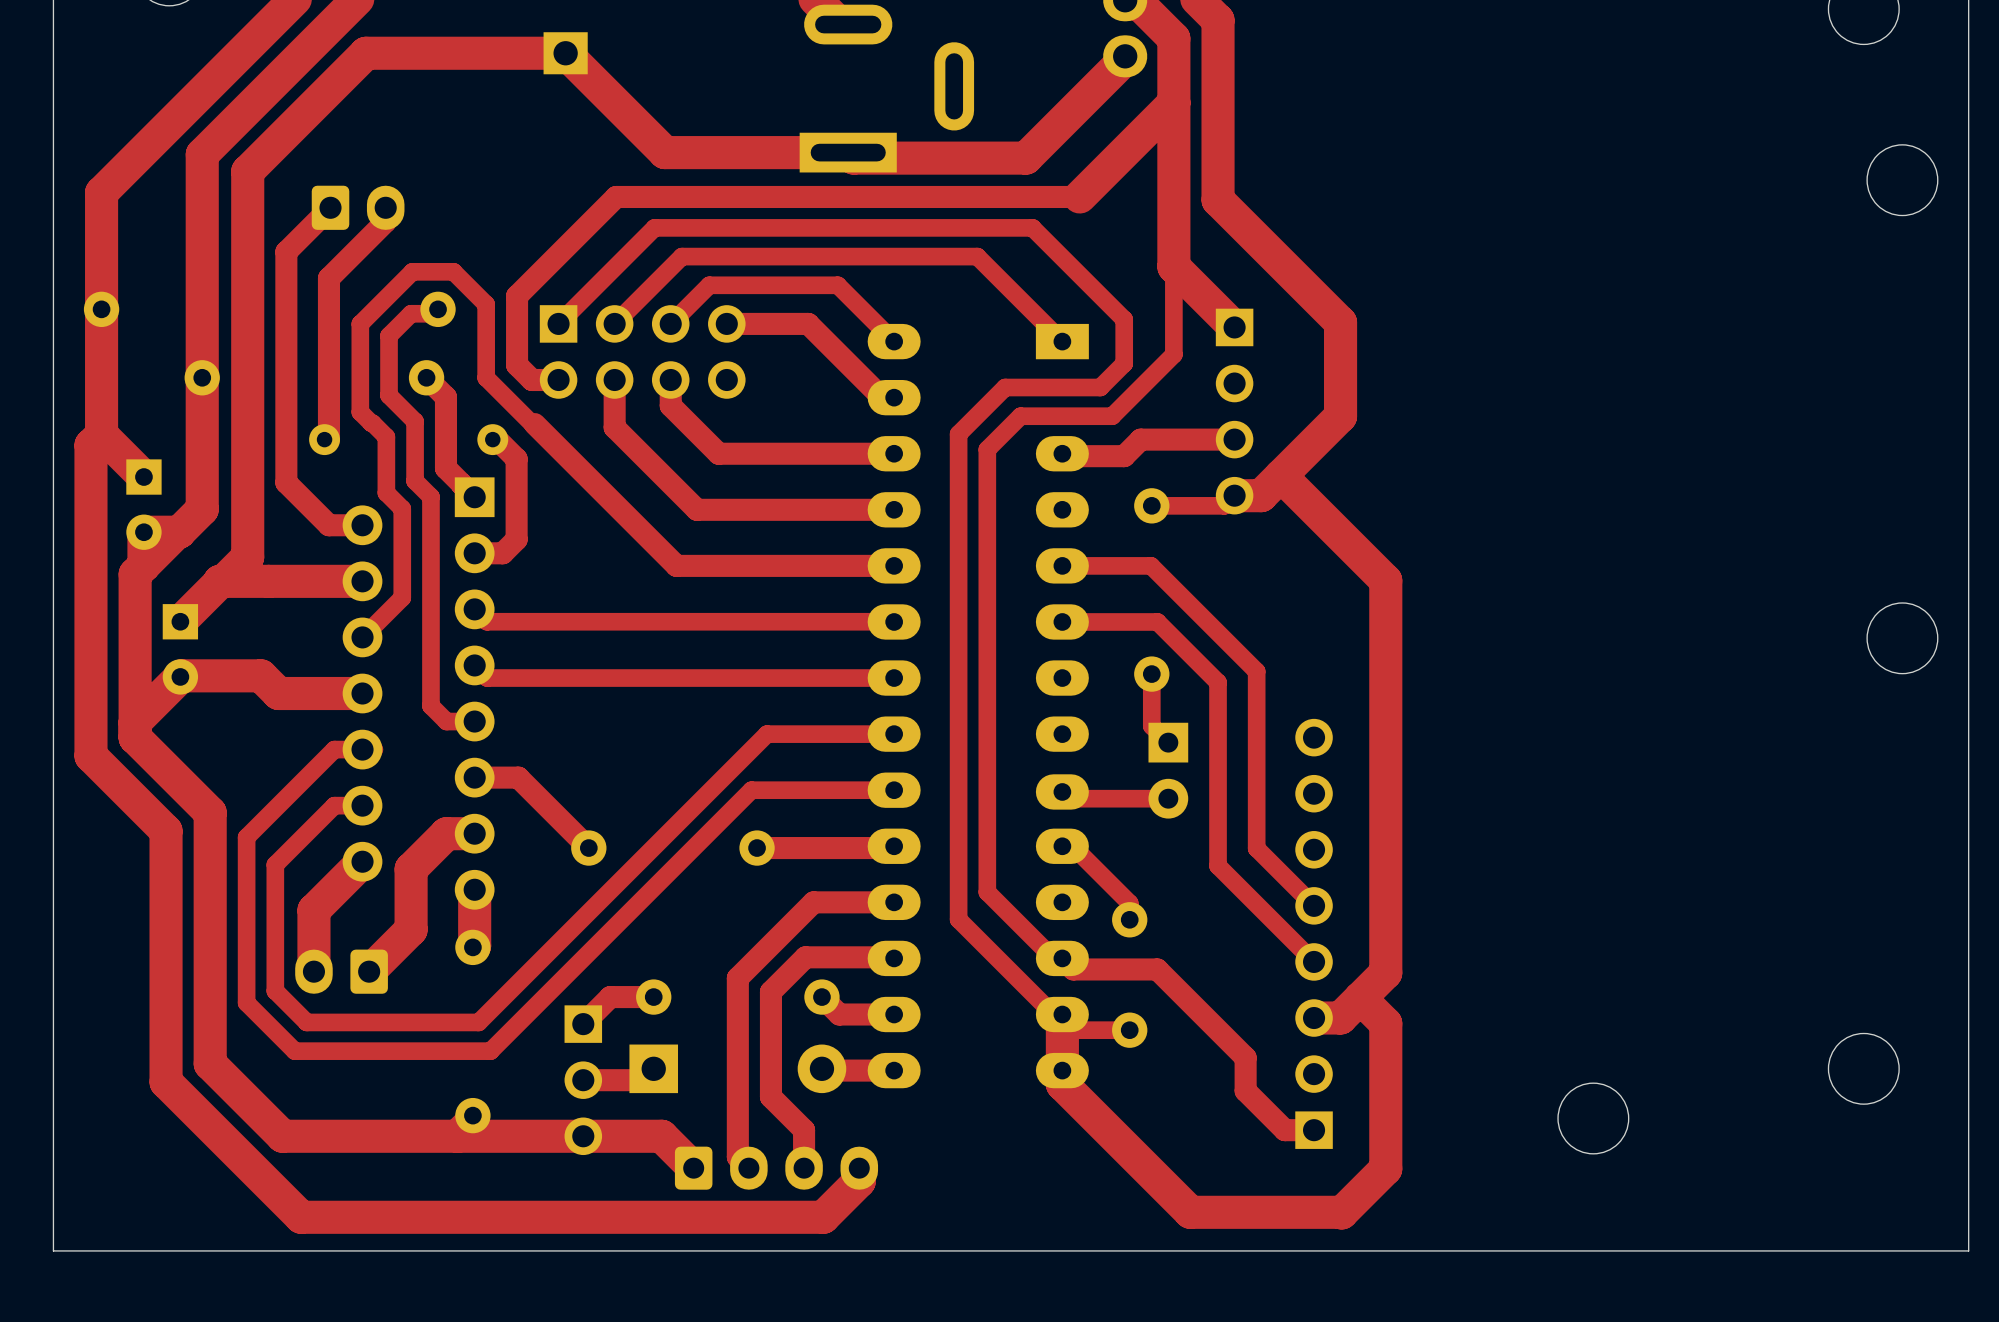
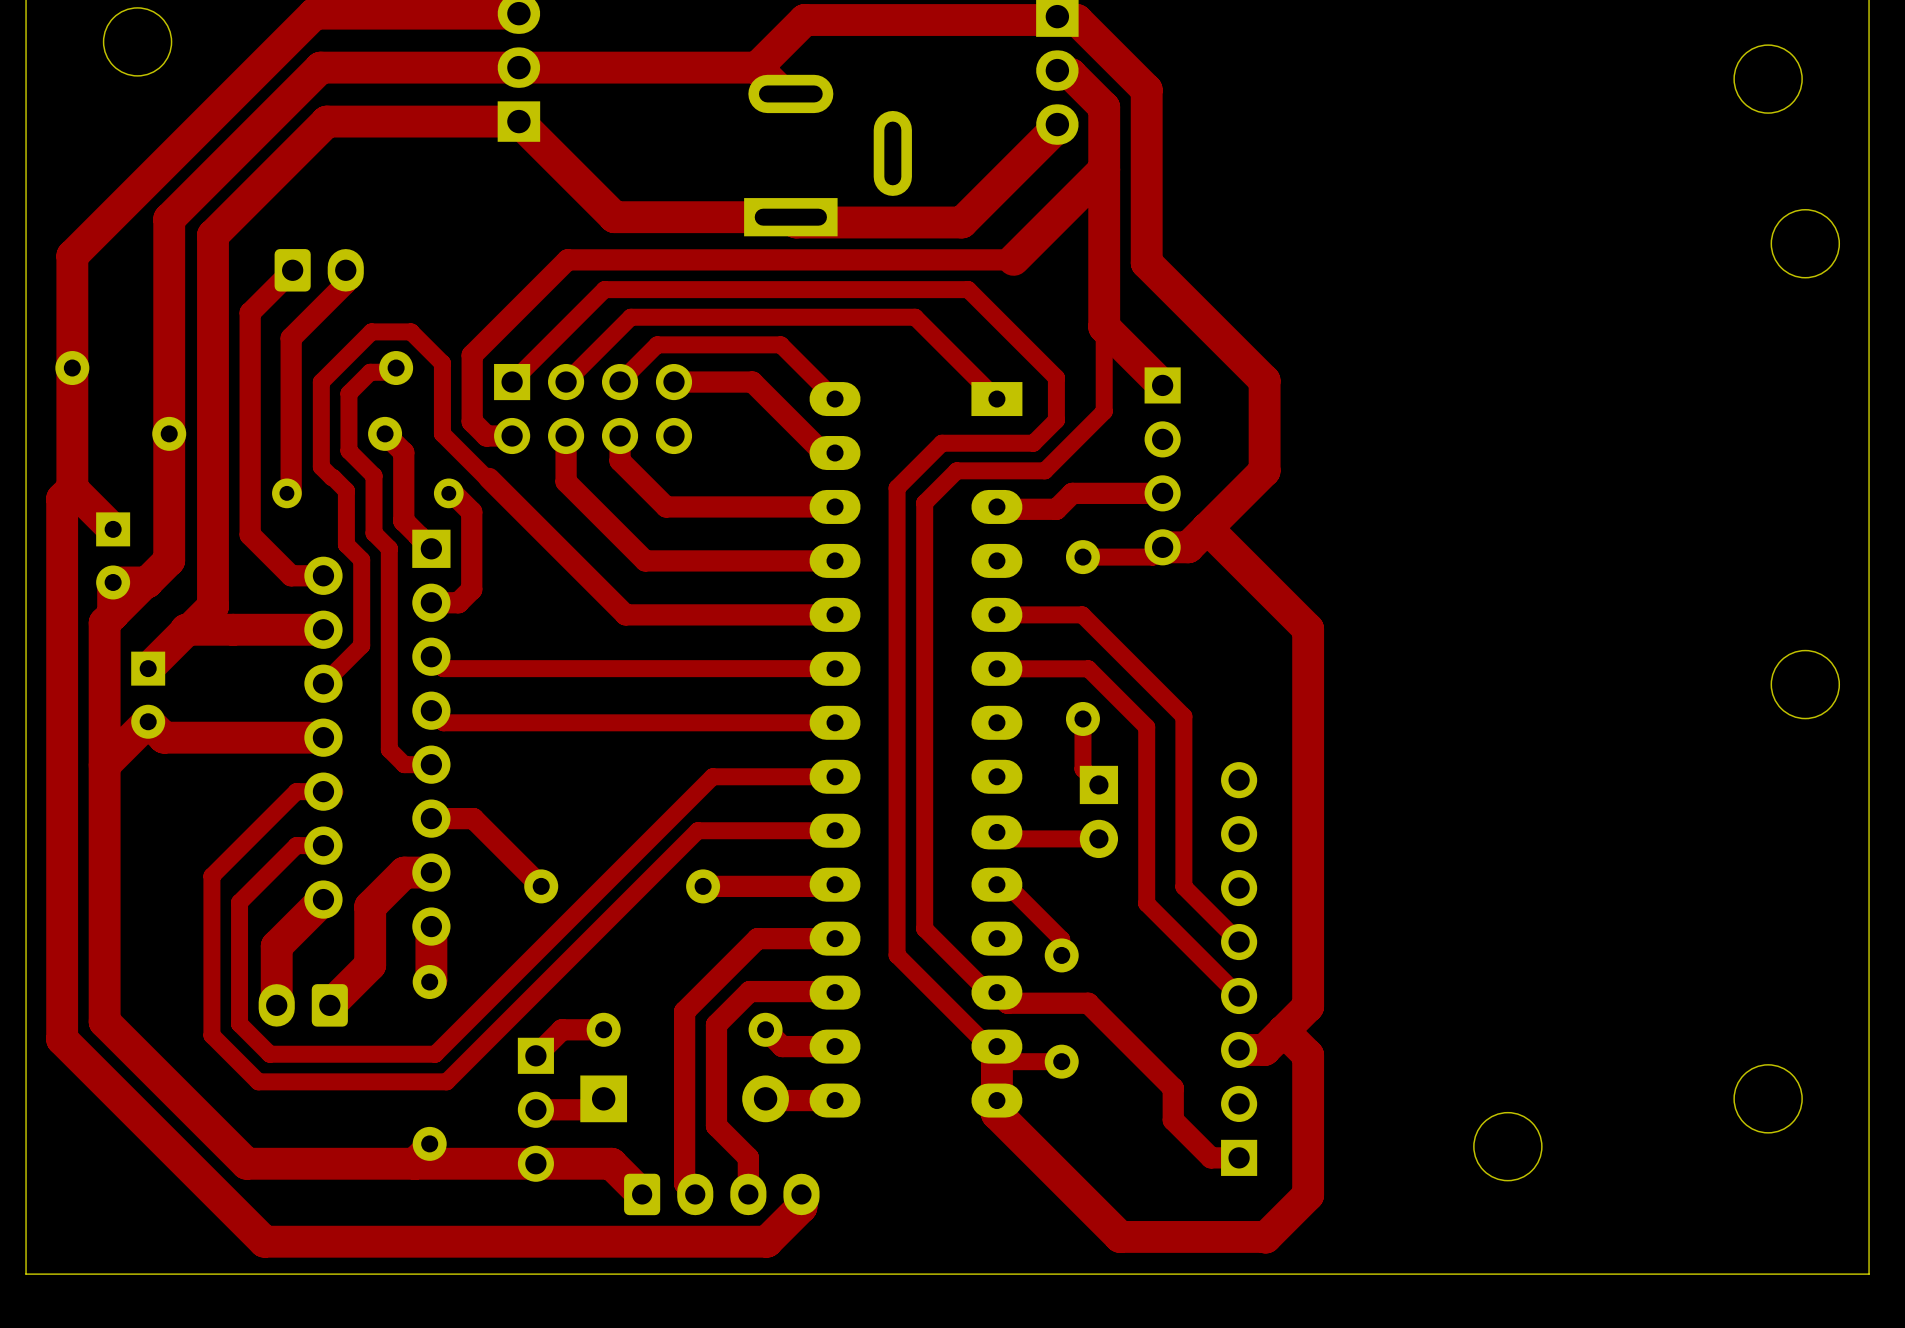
top track: (180, 676) (260, 675) (278, 693) -> (148, 721) (164, 737) (242, 737)
top track: (135, 737) (210, 812) (210, 1063) -> (104, 780) (104, 1021) (176, 1093)
top track: (90, 755) (166, 831) (166, 1082) -> (62, 797) (62, 1039) (134, 1111)

